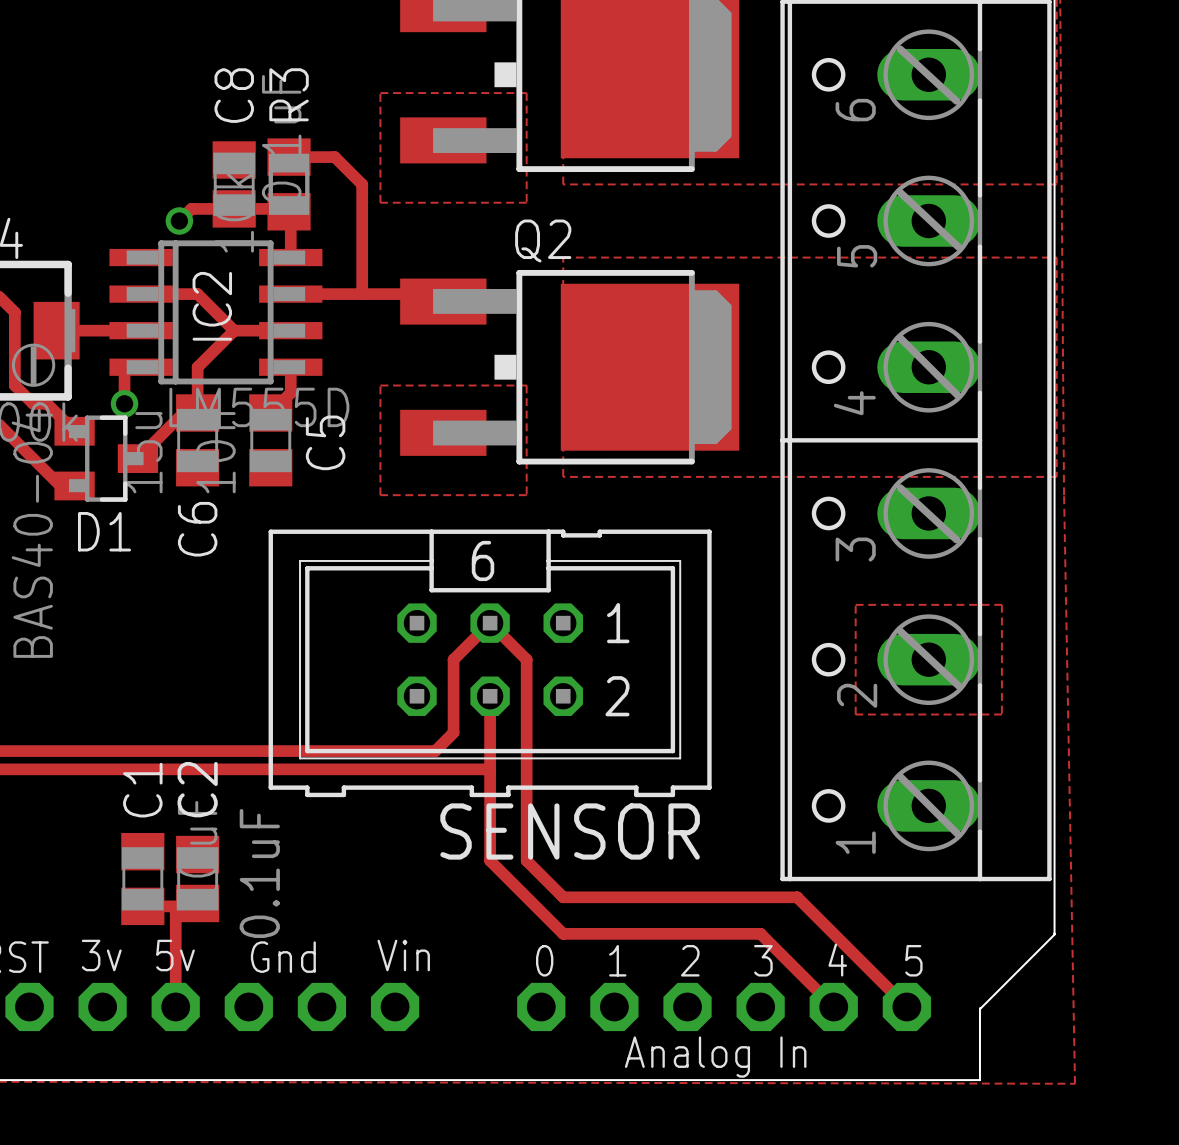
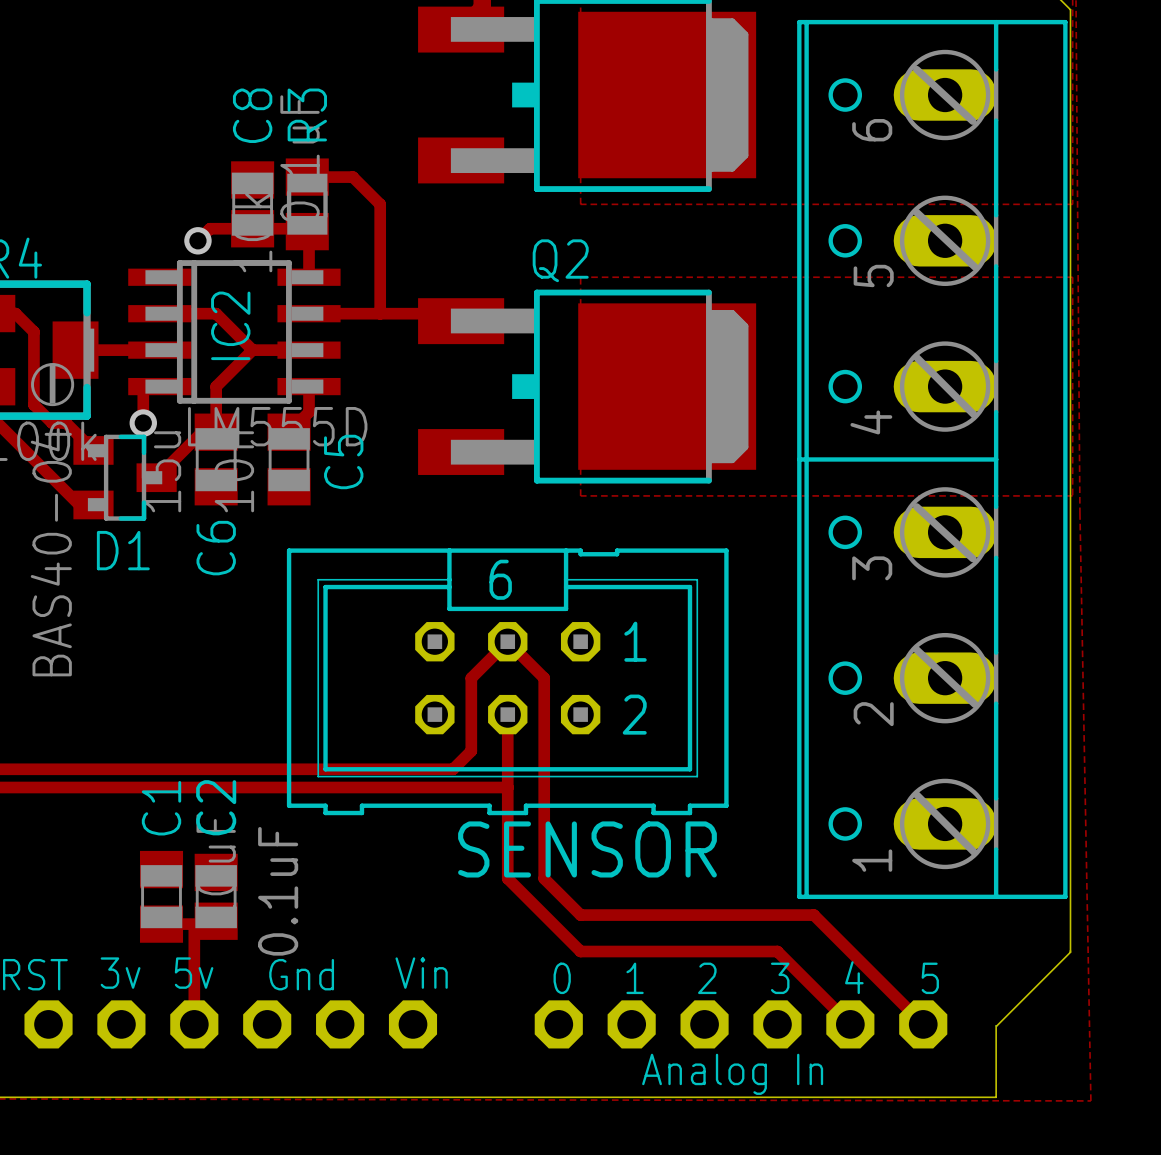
zone outline: (380, 93) (380, 202) (526, 202) (526, 93) (380, 93) -> none
zone outline: (380, 385) (526, 385) (526, 495) (380, 495) (380, 385) -> none
zone outline: (855, 604) (1001, 604) (1001, 714) (855, 714) (855, 604) -> none

